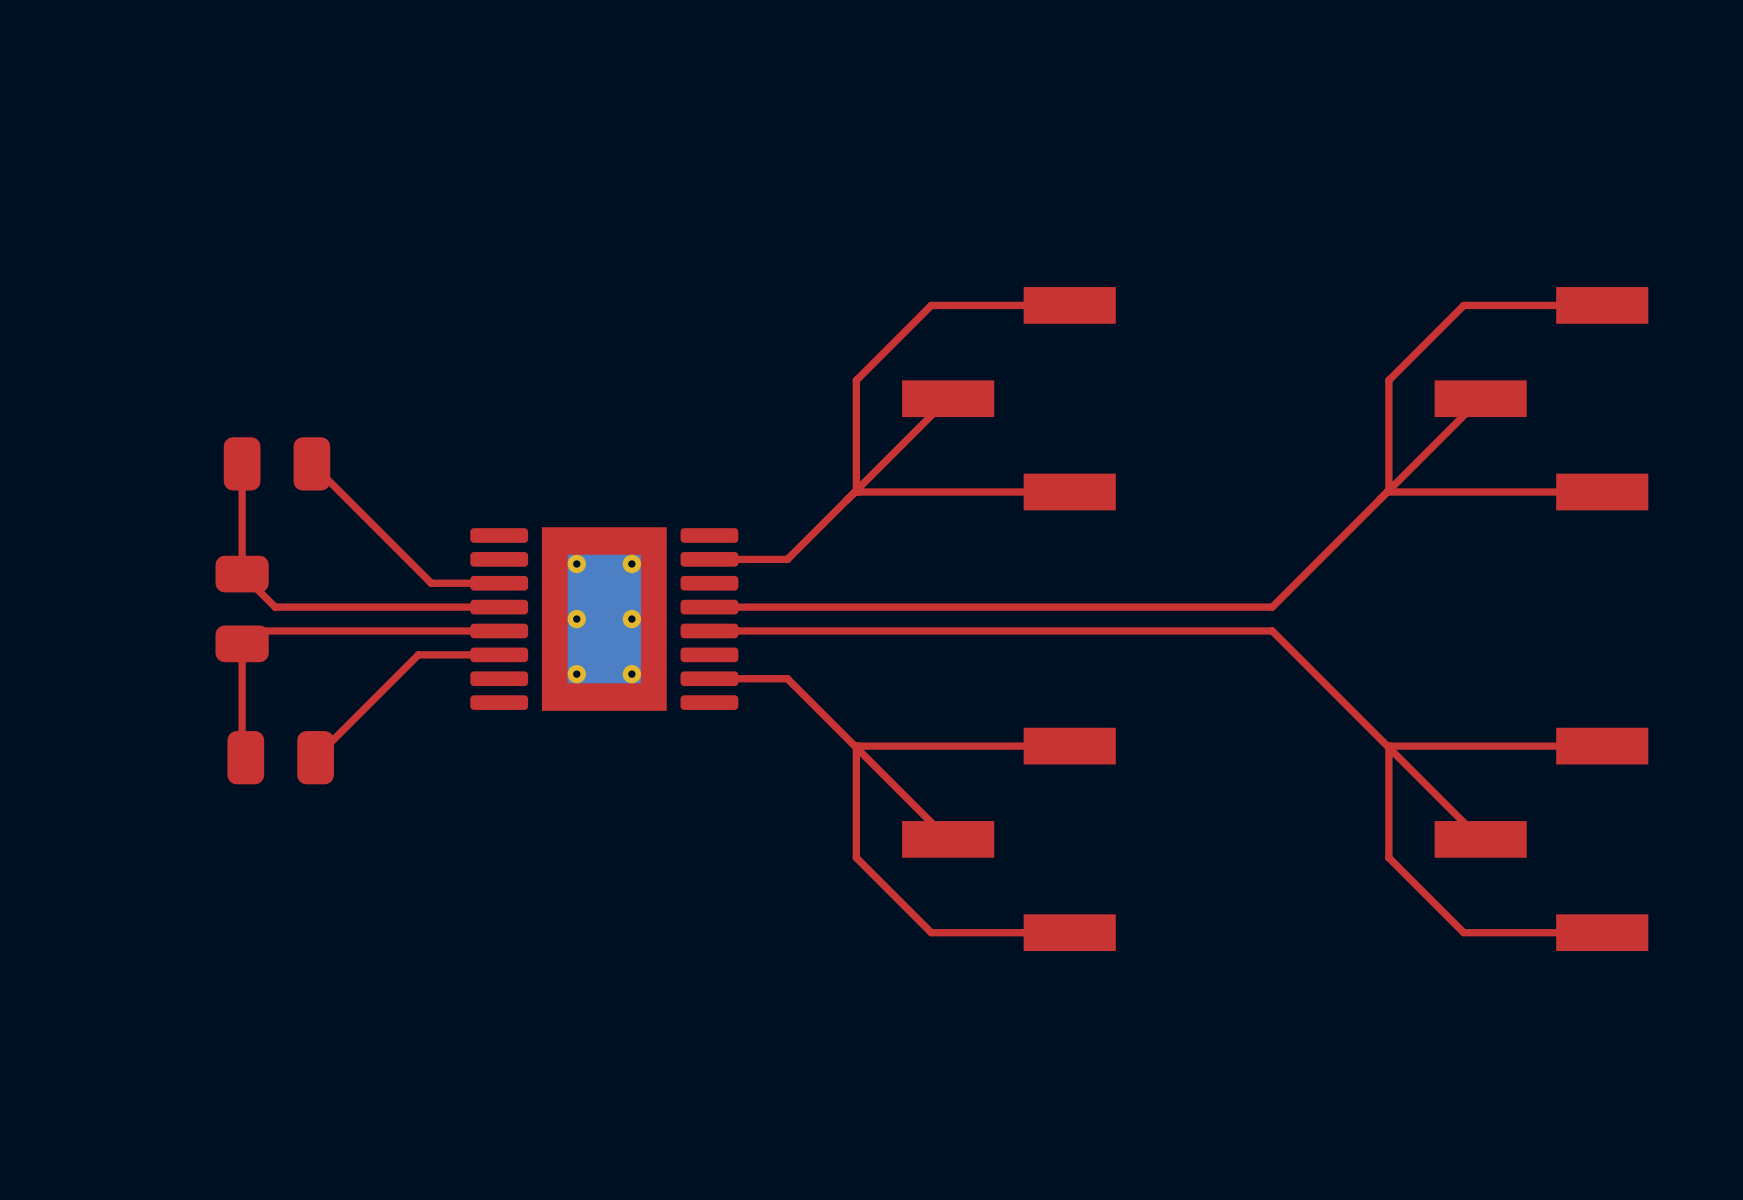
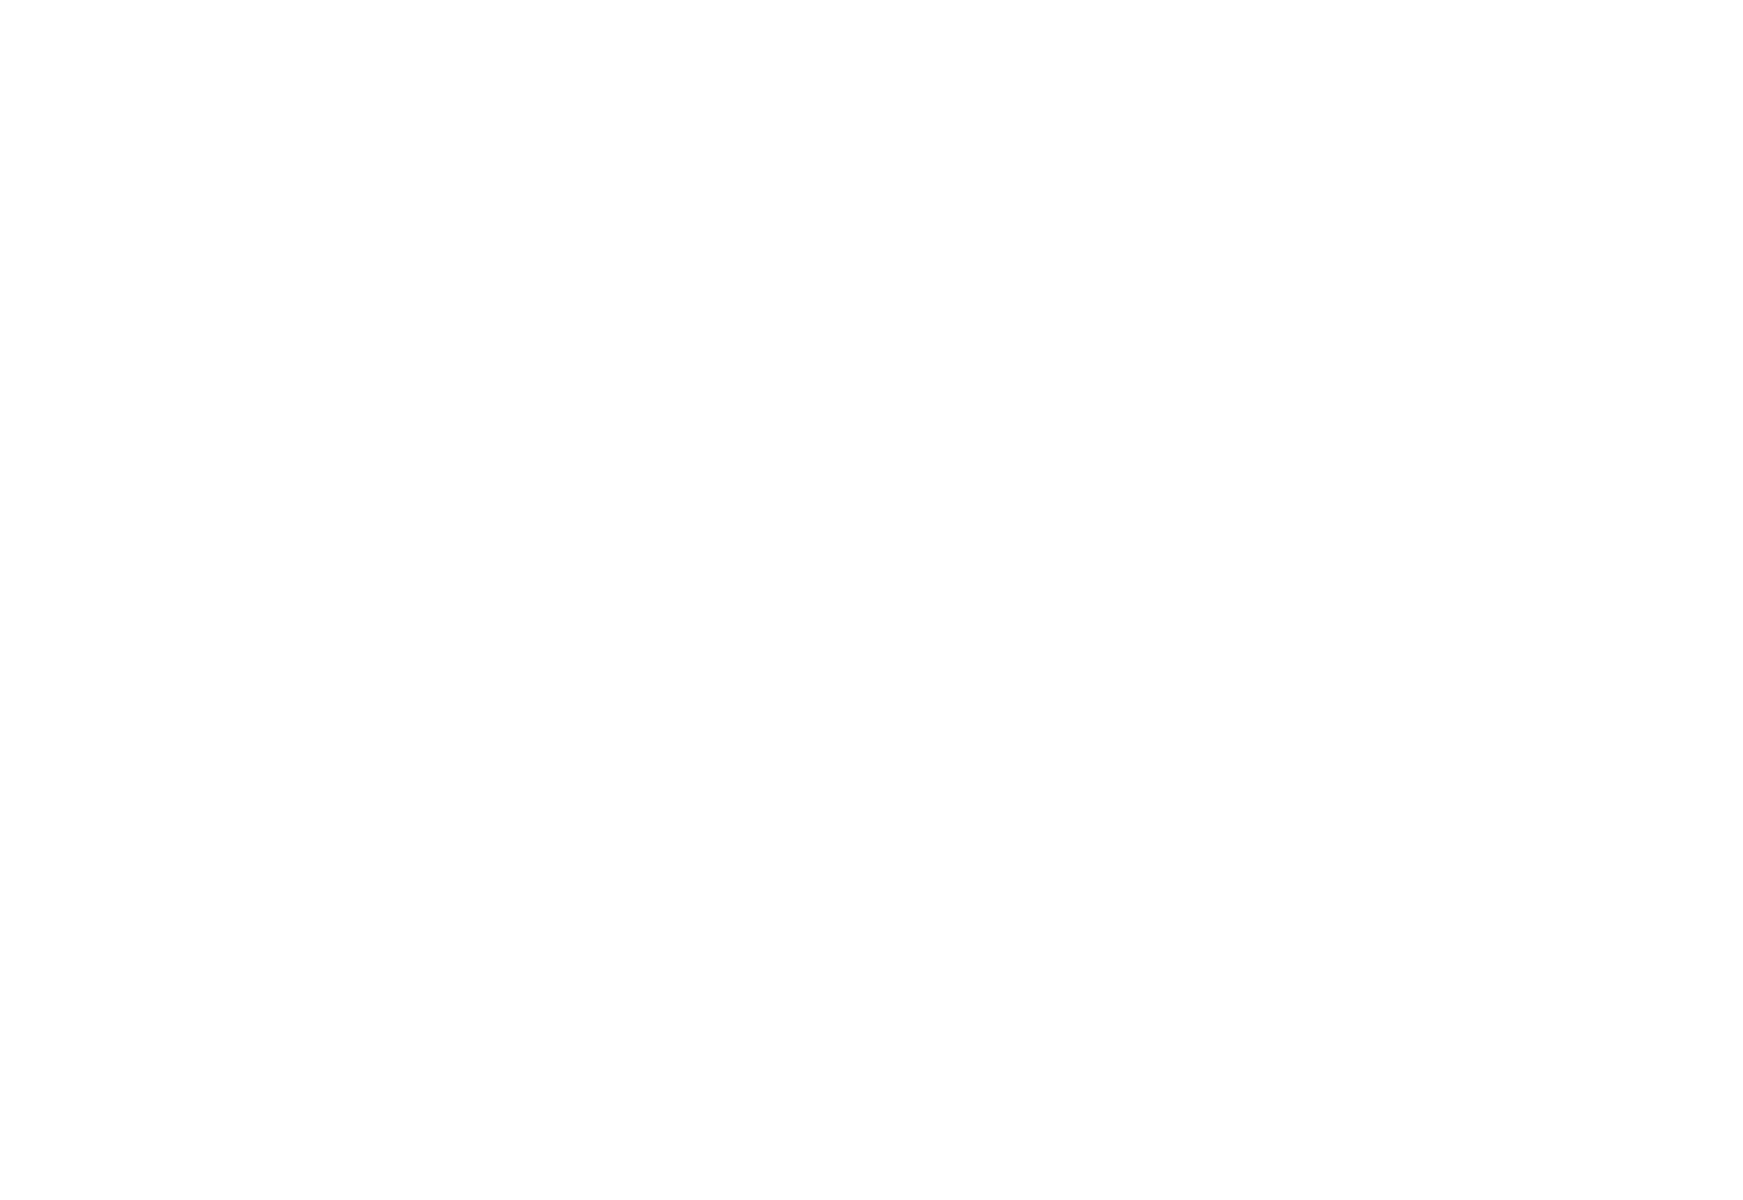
top track: (1069, 305) (931, 305) (856, 380) (857, 491) (1069, 491) -> none
top track: (1602, 305) (1463, 305) (1388, 380) (1388, 490) -> none
top track: (948, 398) (787, 559) (709, 559) -> none
part: (1008, 398) -> none
top track: (1480, 398) (1272, 607) (709, 607) -> none
part: (1541, 398) -> none
top track: (242, 463) (242, 574) (275, 607) (499, 607) -> none
part: (277, 463) -> none
top track: (311, 463) (431, 583) (499, 583) -> none
top track: (1602, 491) (1387, 491) -> none
part: (242, 608) -> none
part: (604, 619) -> none
top track: (499, 630) (254, 630) (242, 643) (242, 754) (245, 757) -> none
top track: (709, 630) (1272, 630) (1480, 839) -> none
top track: (499, 654) (418, 654) (315, 757) -> none
top track: (709, 678) (787, 678) (948, 839) -> none
top track: (1069, 746) (856, 747) (856, 857) (931, 932) (1069, 932) -> none
top track: (1602, 746) (1388, 747) (1388, 857) (1463, 932) (1602, 932) -> none
part: (280, 757) -> none
part: (1008, 839) -> none
part: (1541, 839) -> none

